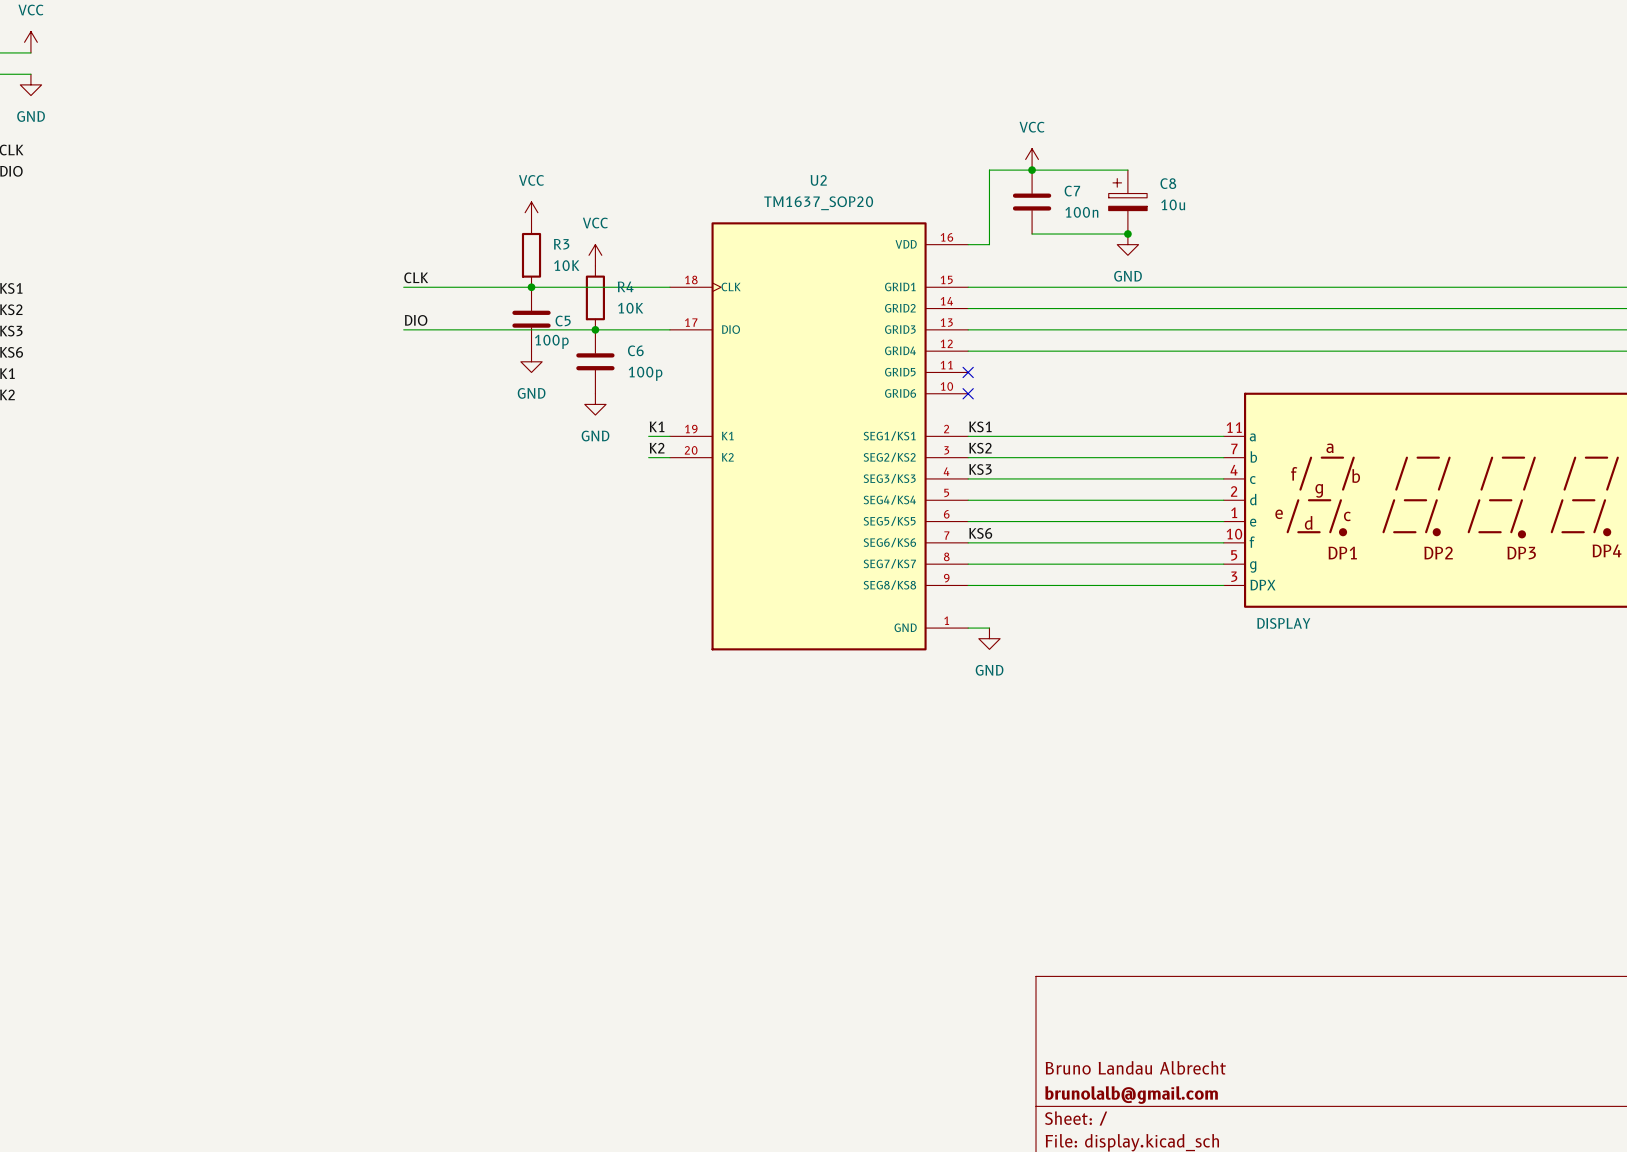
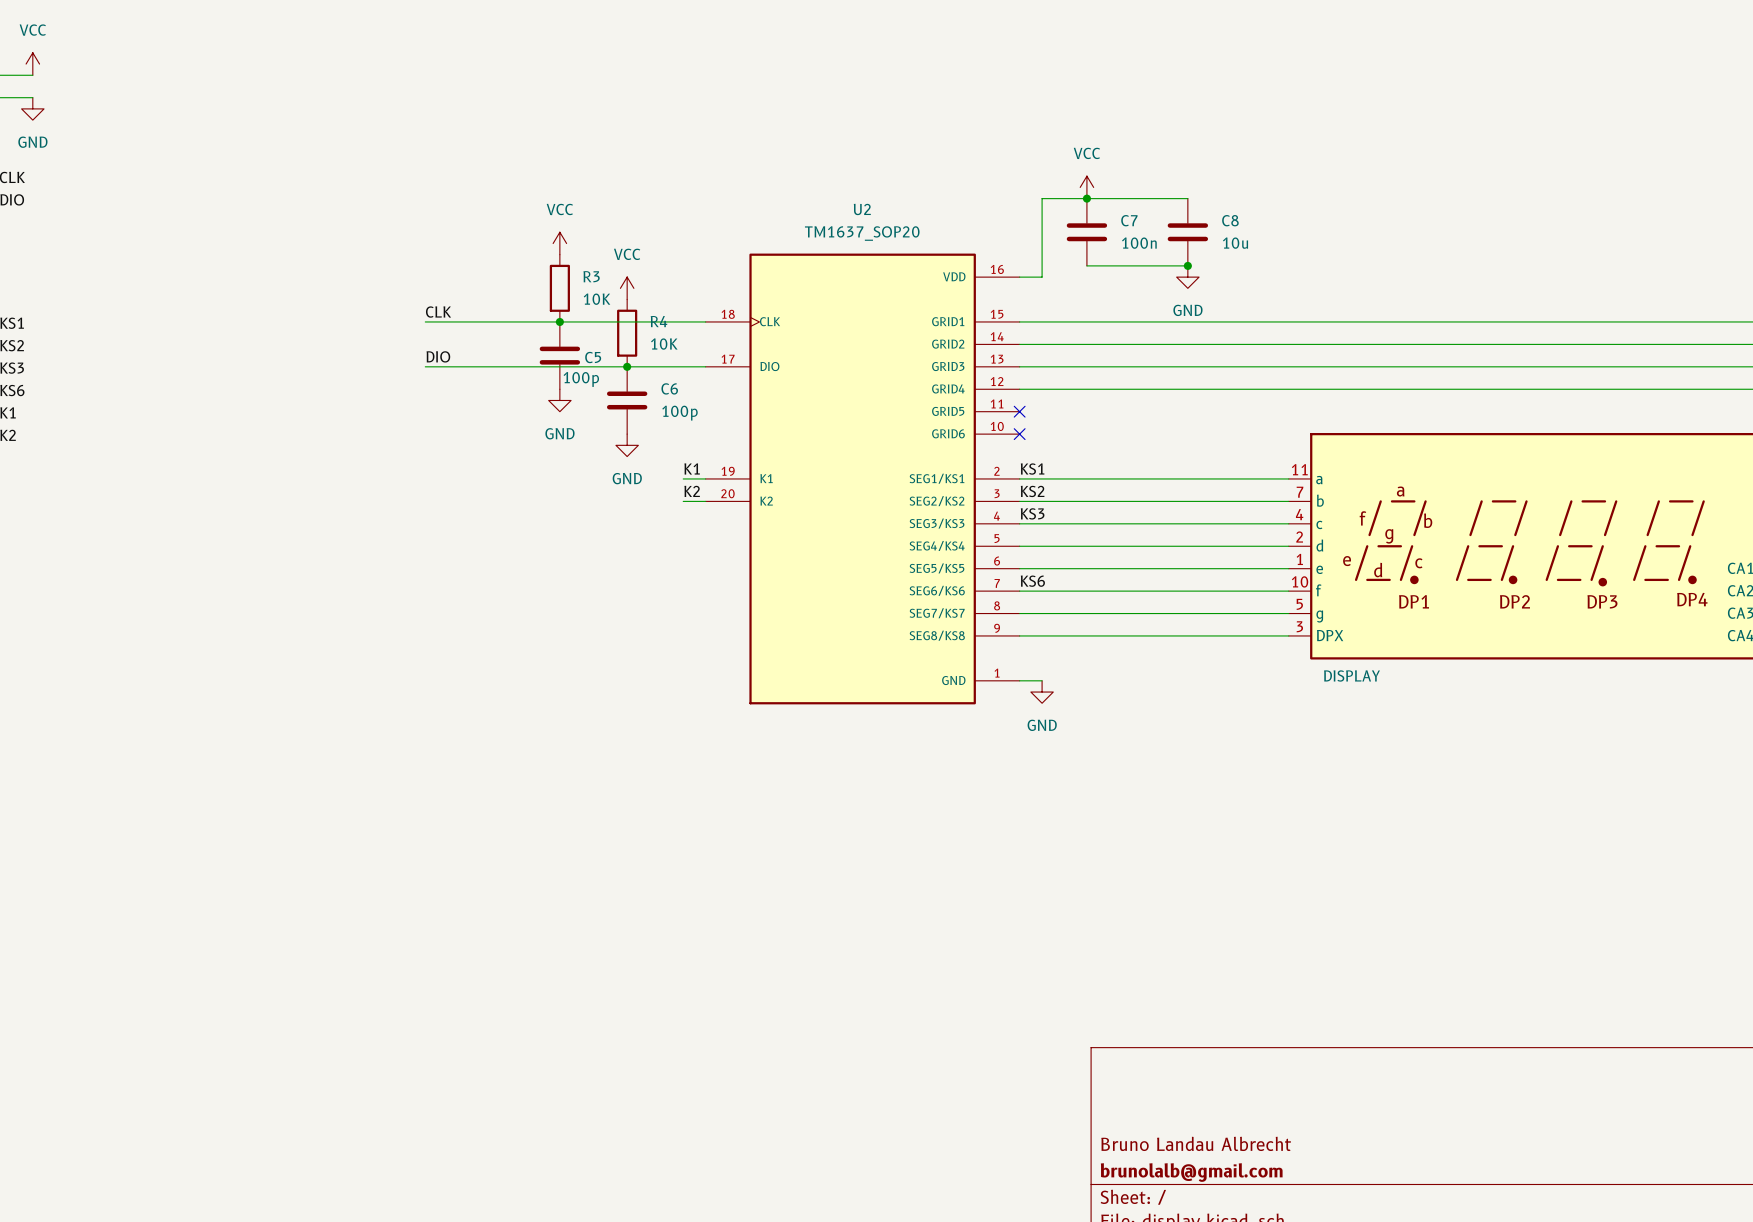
C8 symbol: [1108, 170, 1148, 235] -> [1167, 198, 1209, 266]

